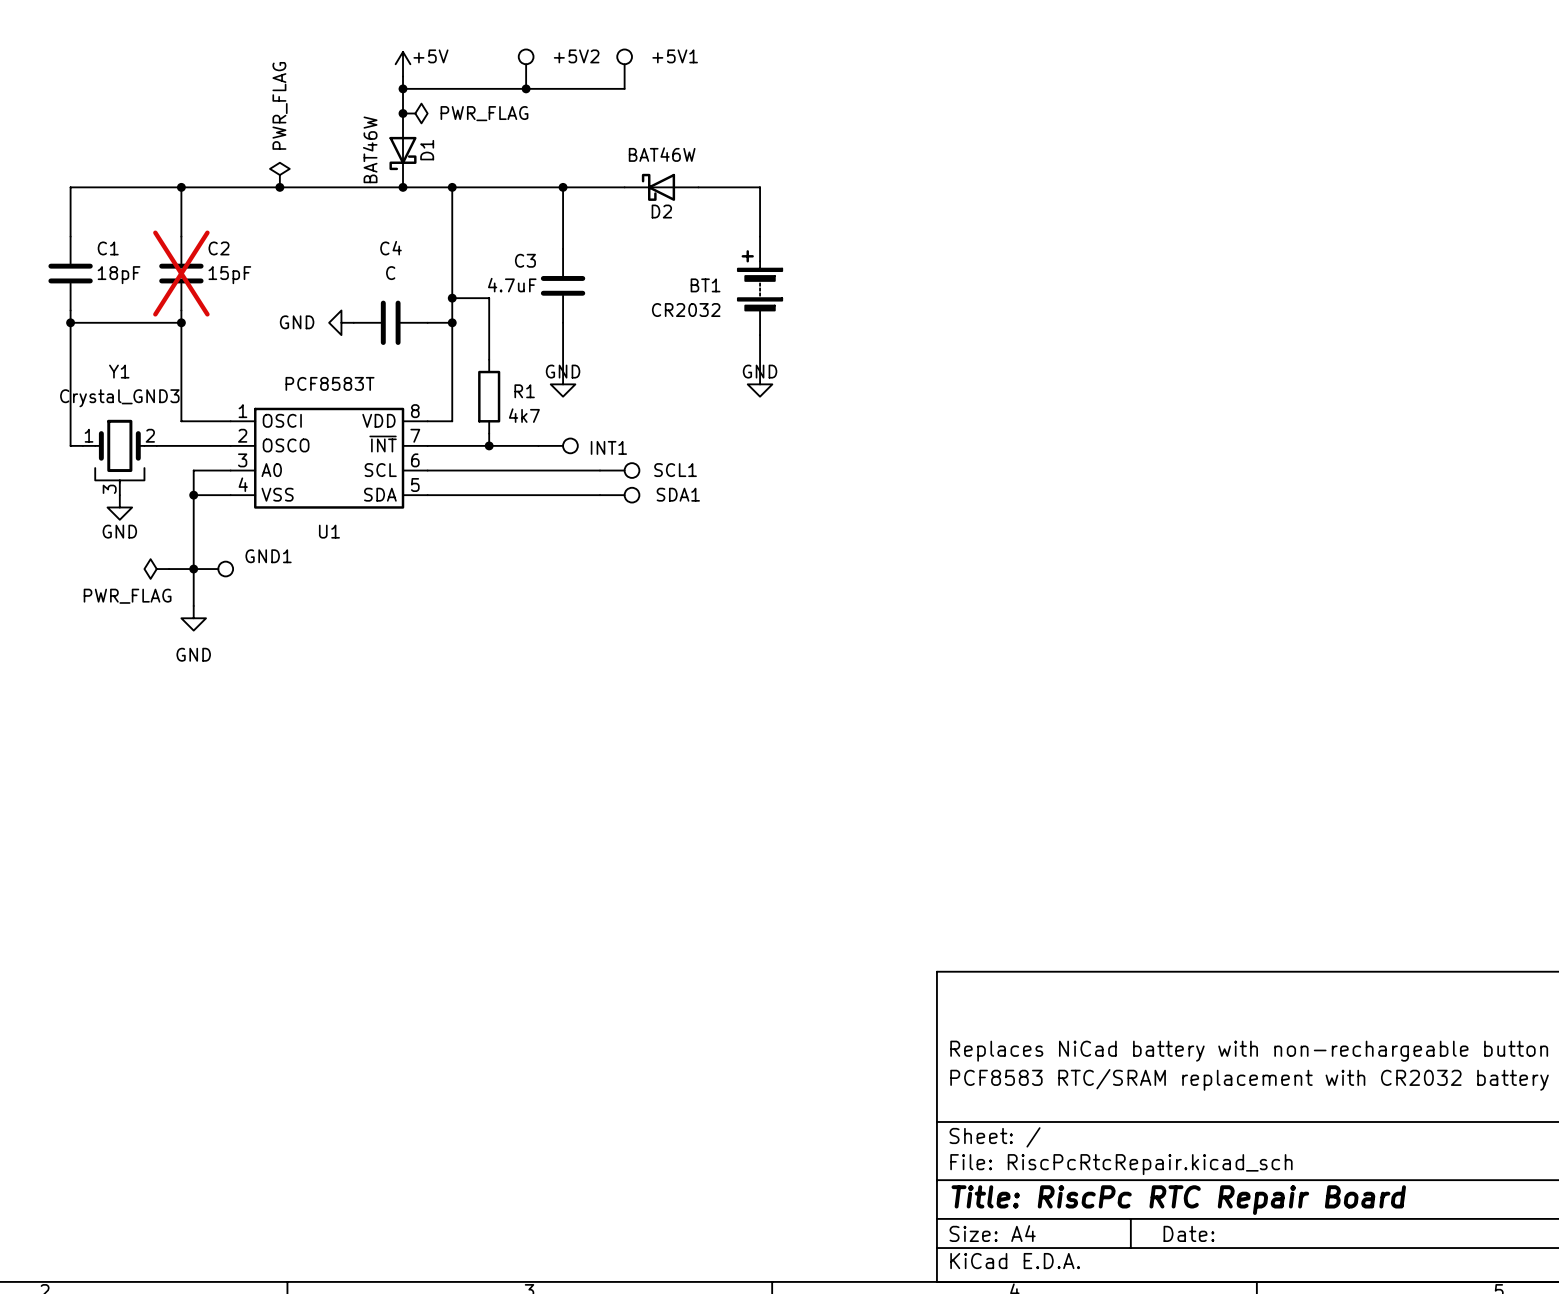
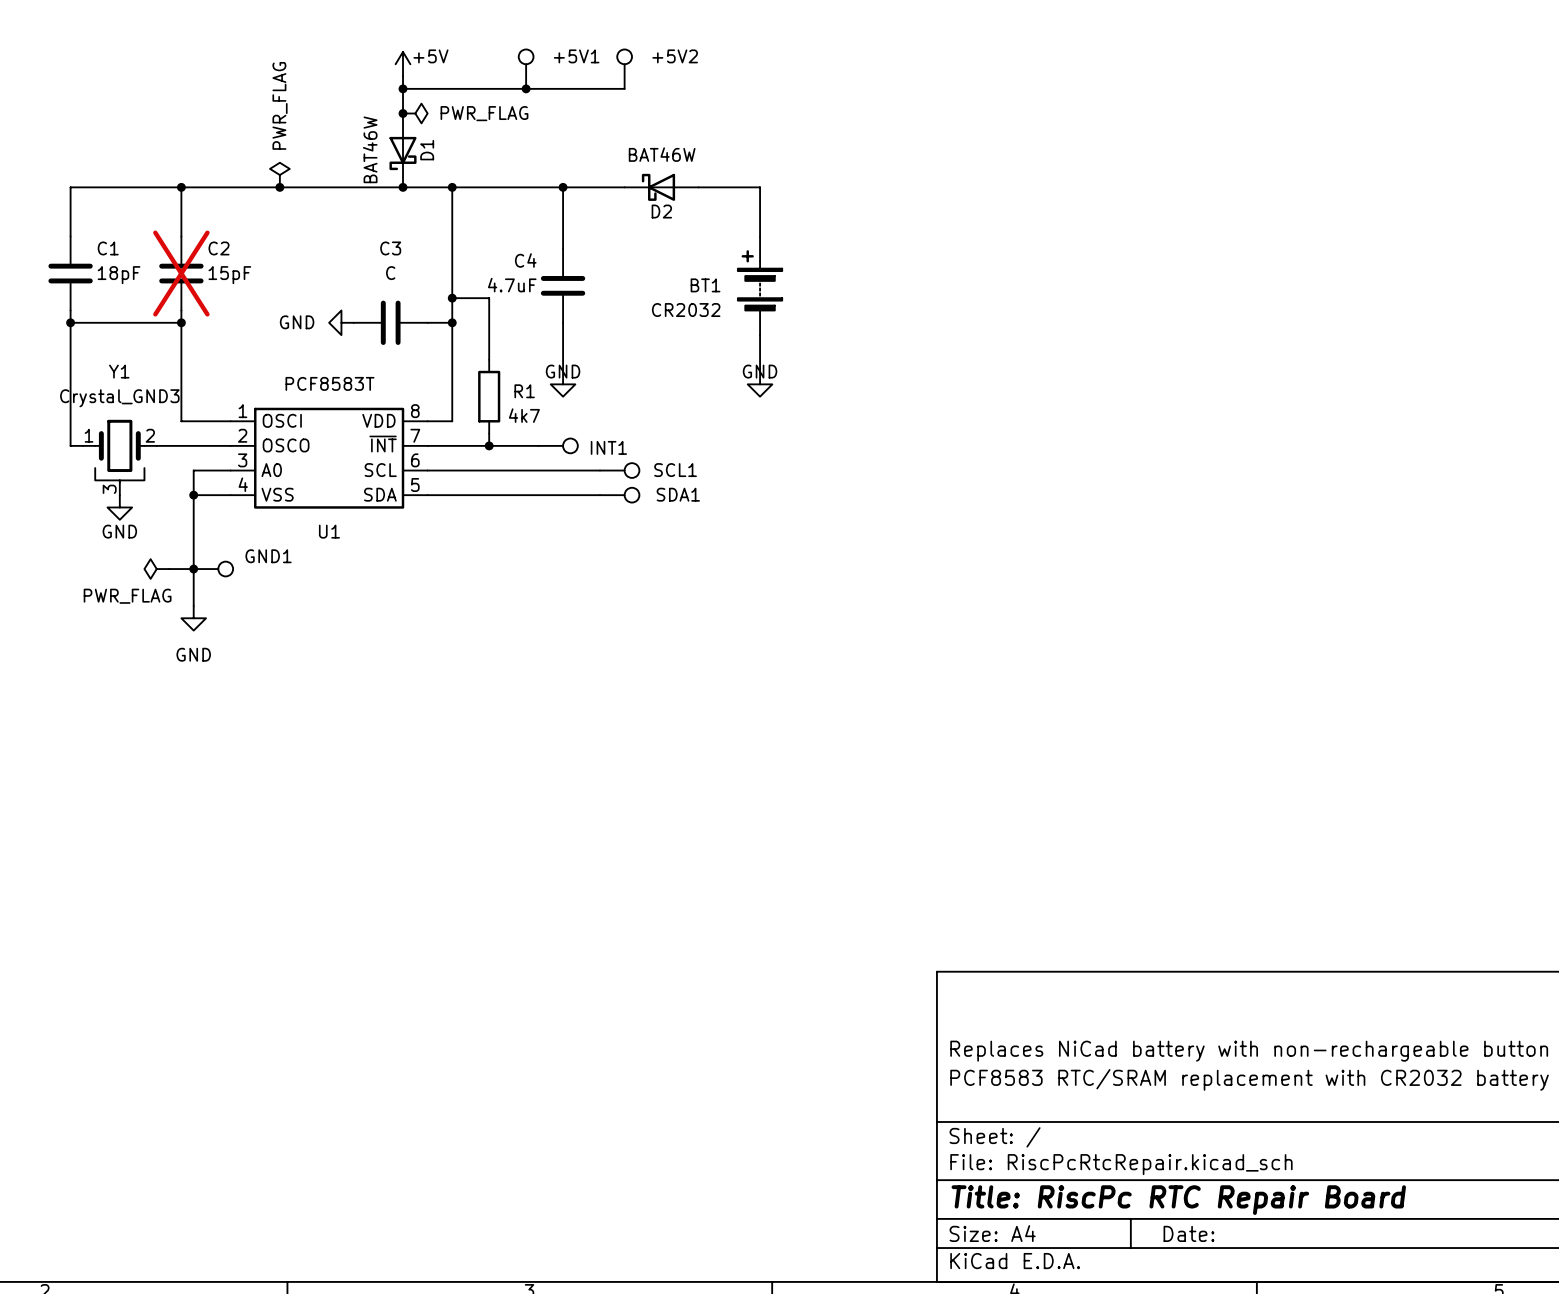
+5V2 name: +5V2 (576, 56) -> +5V1 (576, 56)
+5V1 name: +5V1 (675, 56) -> +5V2 (675, 56)
C4 name: C4 (390, 248) -> C3 (390, 248)
C3 name: C3 (525, 260) -> C4 (525, 260)

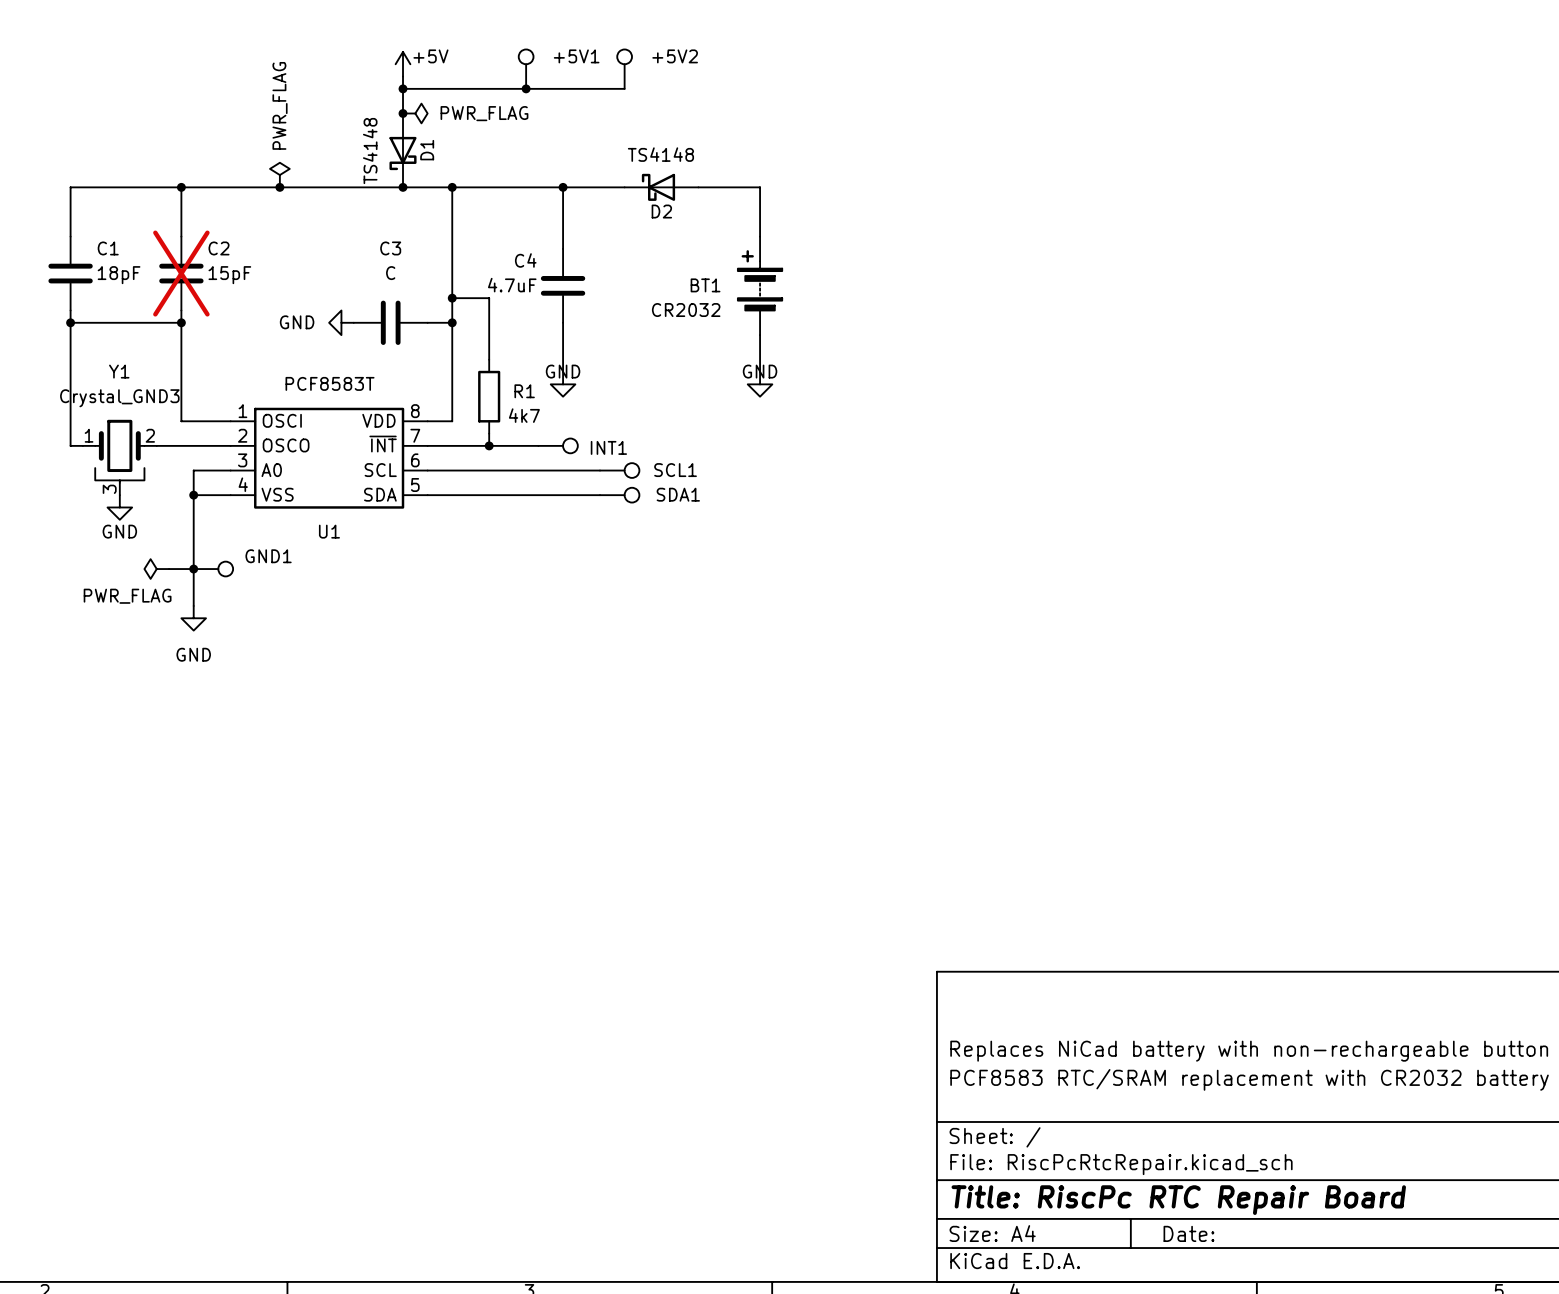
D1 value: BAT46W (370, 149) -> TS4148 (370, 151)
D2 value: BAT46W (662, 154) -> TS4148 (660, 154)

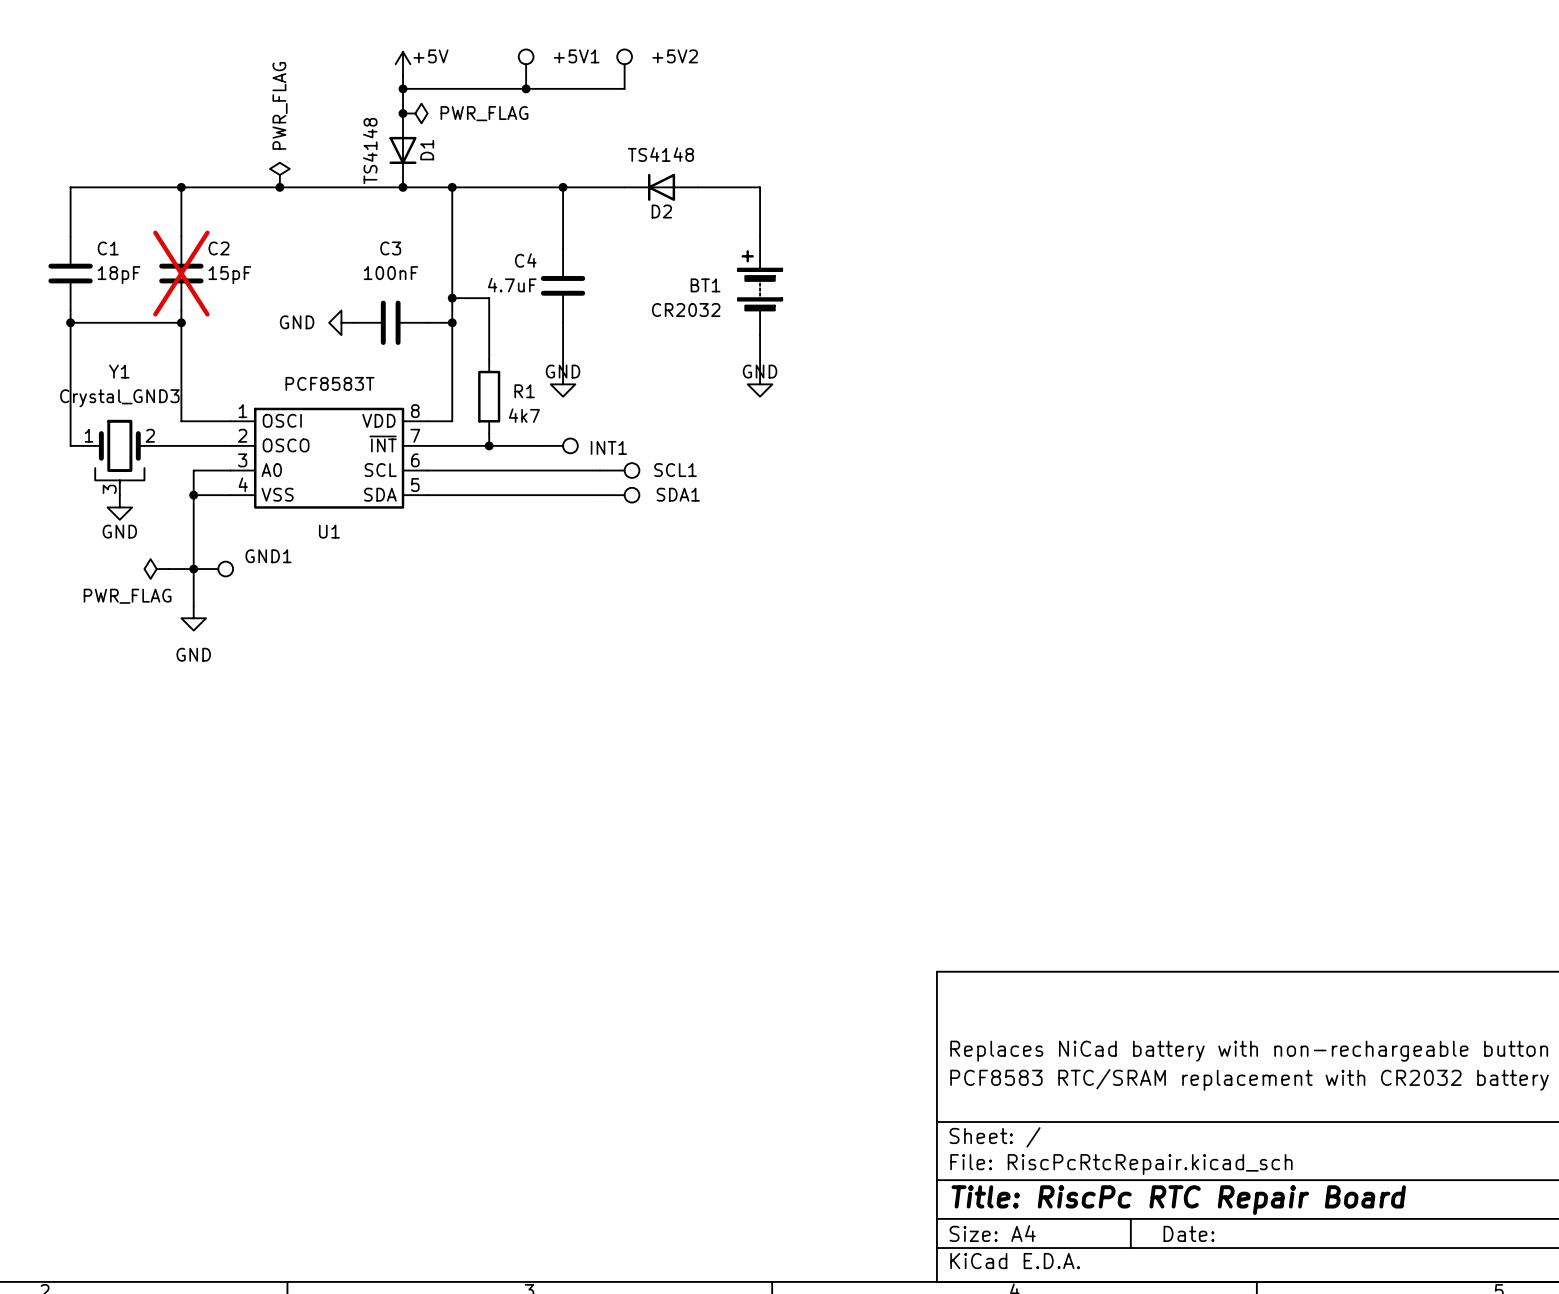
D1 symbol: [389, 113, 417, 188] -> [389, 113, 417, 188]
D2 symbol: [624, 173, 699, 201] -> [624, 173, 699, 201]
C3 value: C (390, 273) -> 100nF (390, 273)

